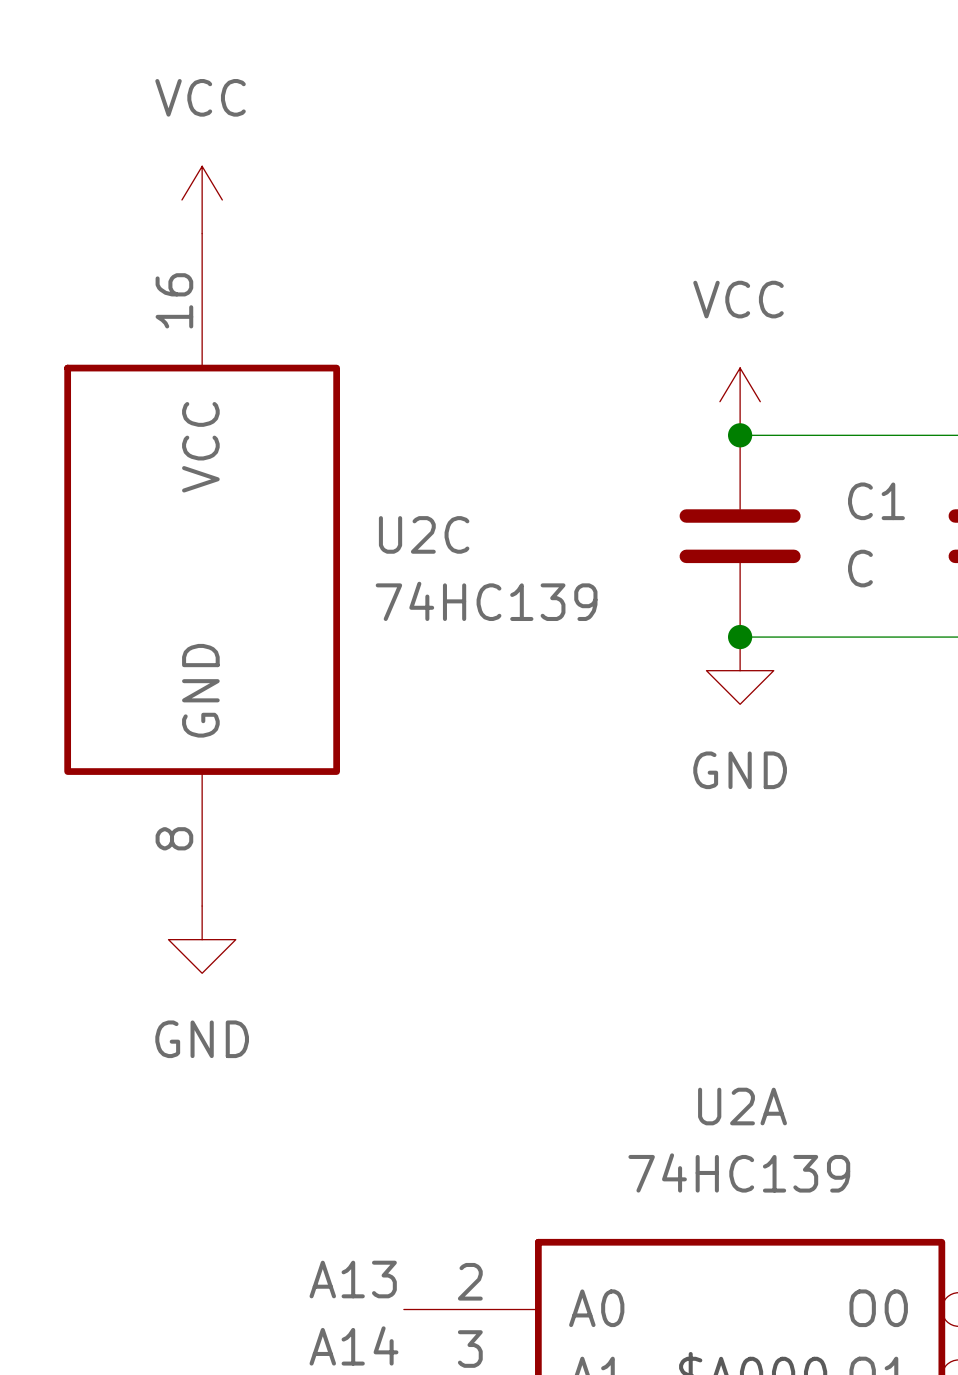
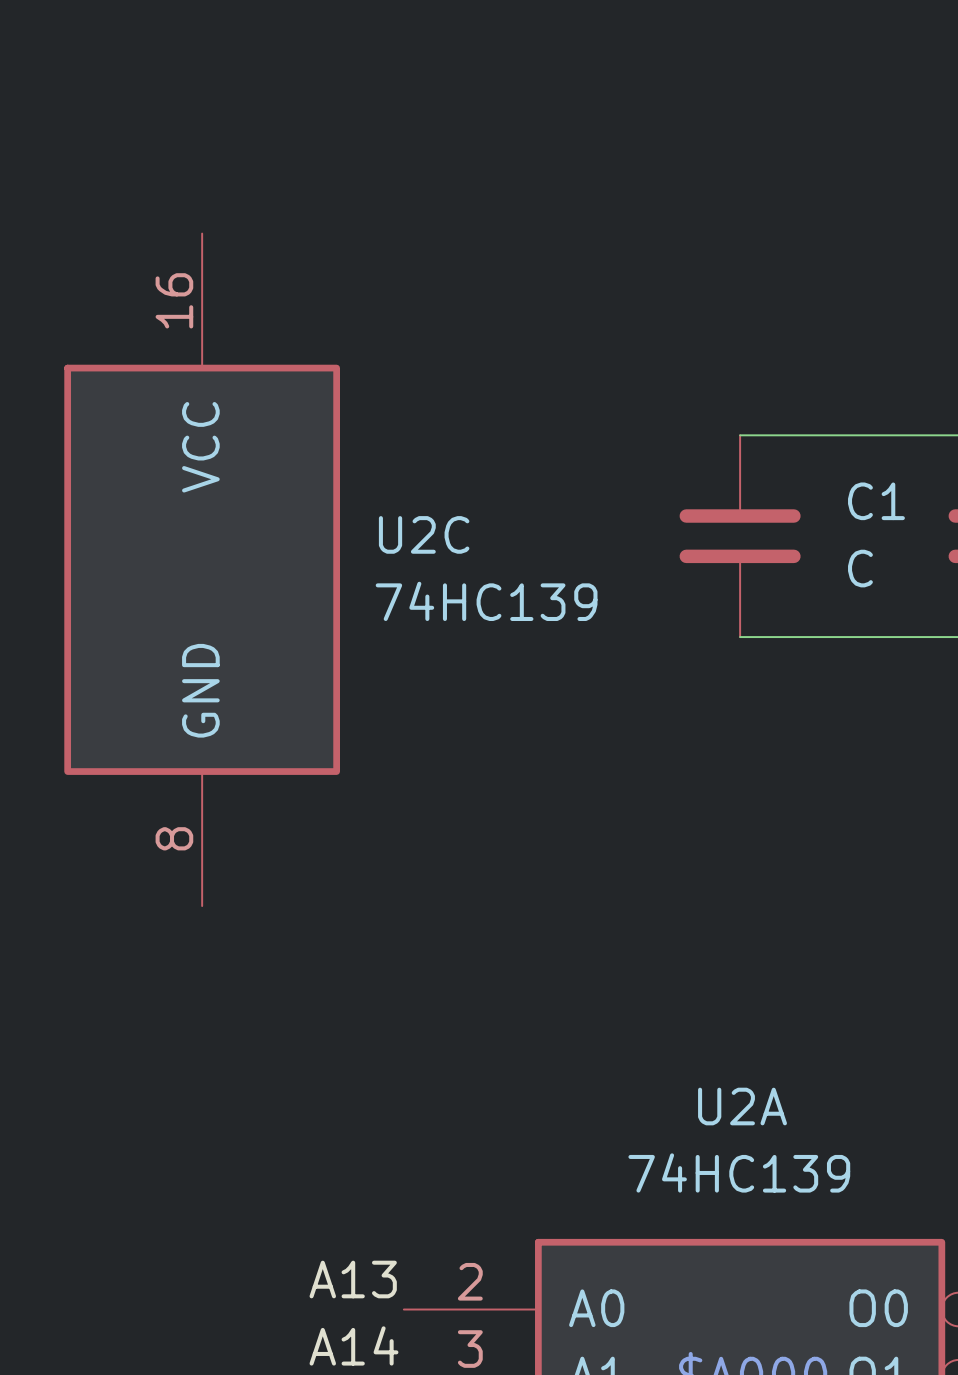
power symbol: VCC (202, 199) -> none
power symbol: VCC (740, 401) -> none
junction: (740, 435) -> none
junction: (740, 637) -> none
power symbol: GND (740, 670) -> none
power symbol: GND (202, 939) -> none

